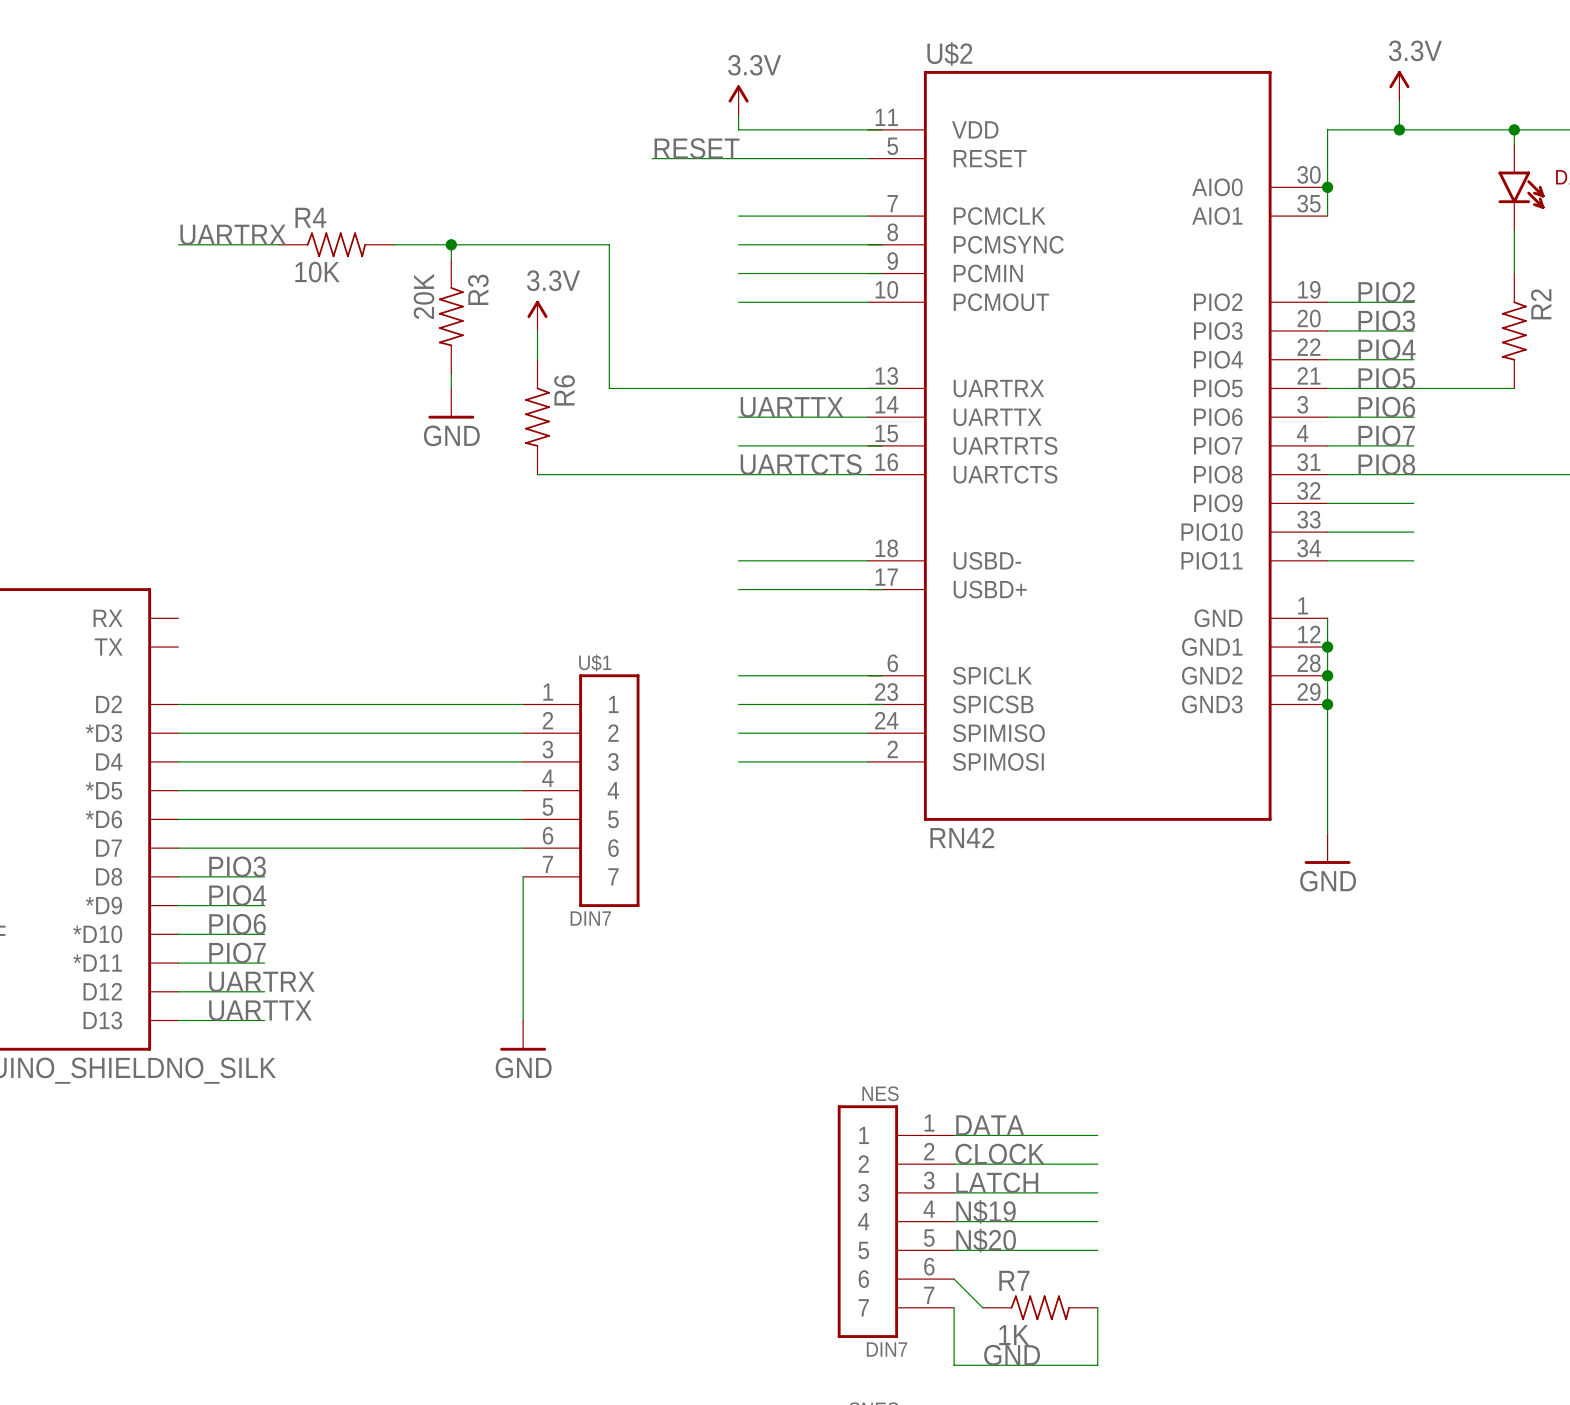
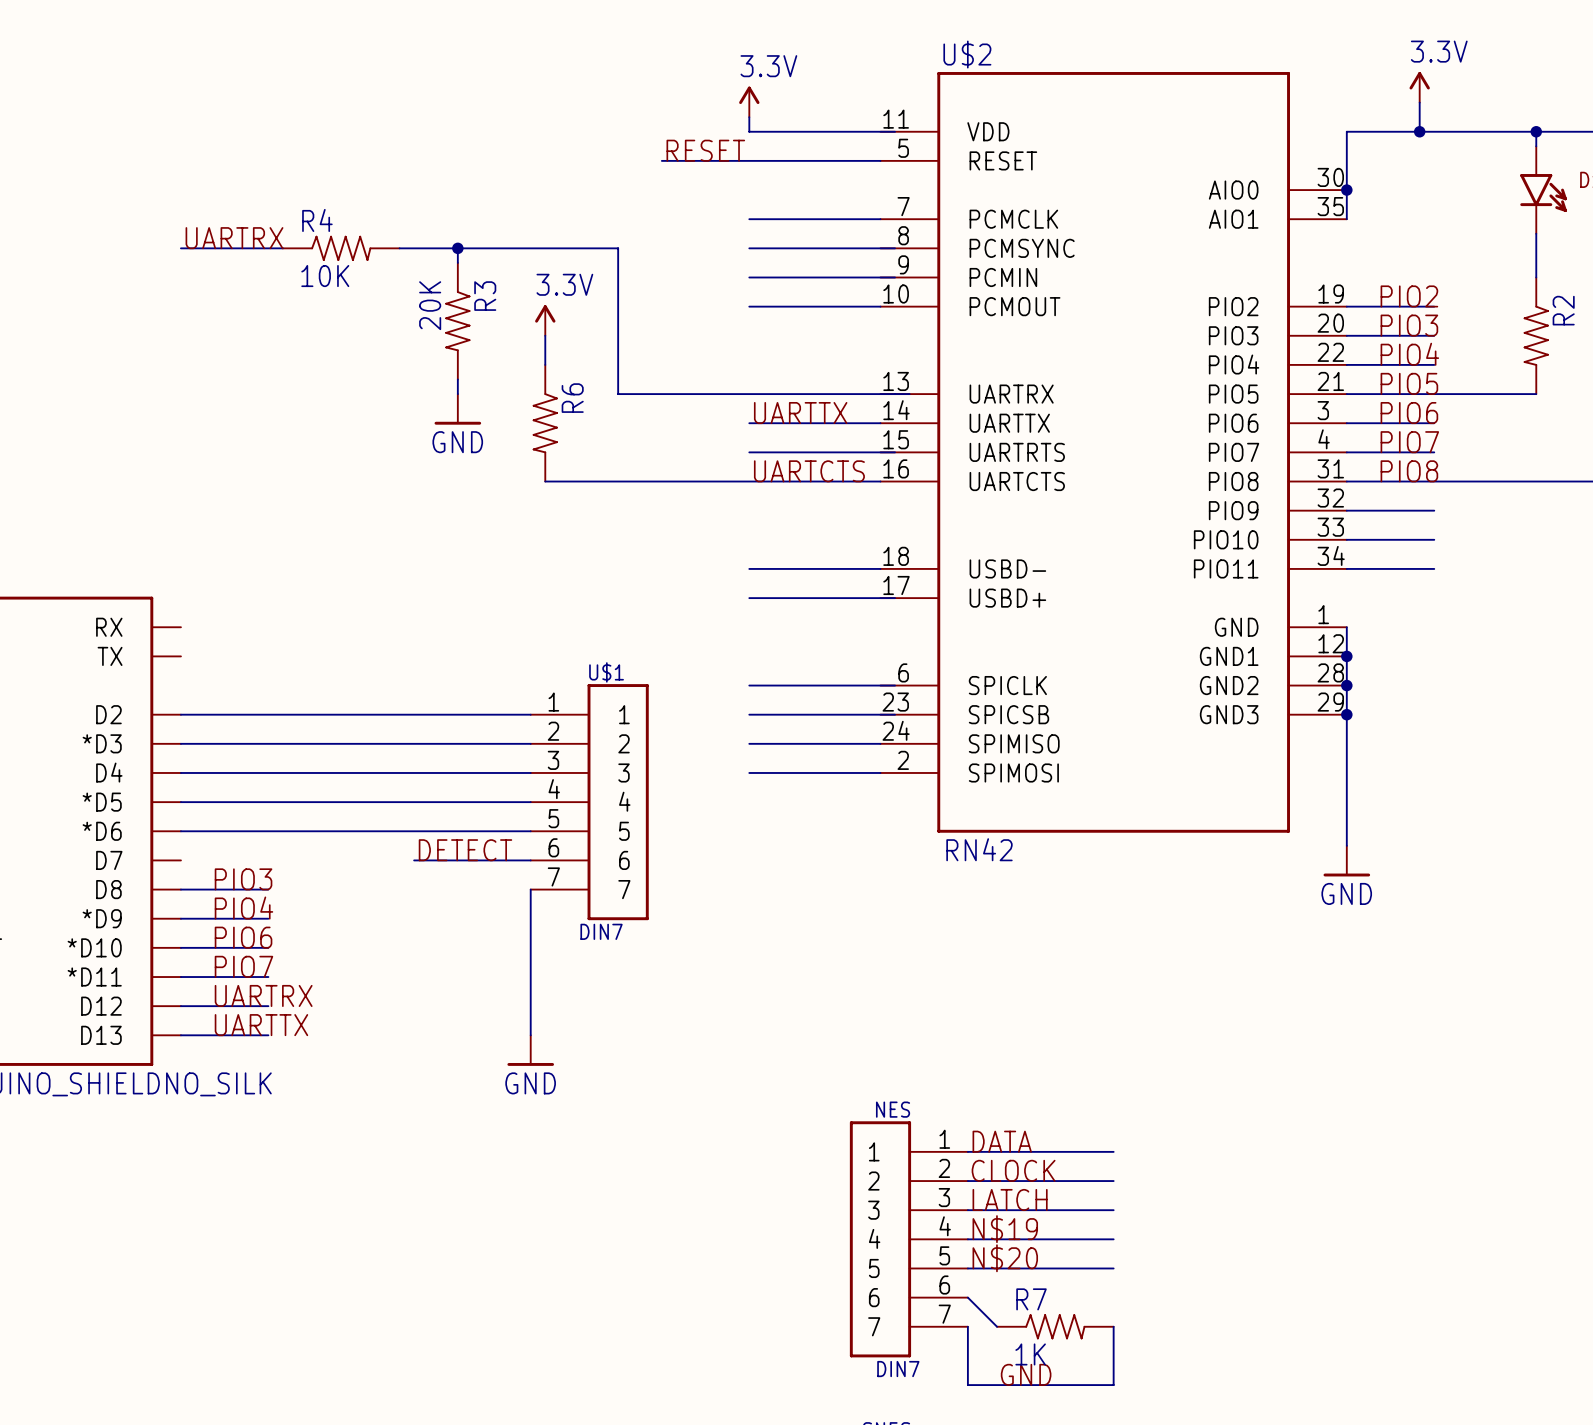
label: none -> DETECT (465, 850)
wire: (178, 848) (408, 848) -> none

